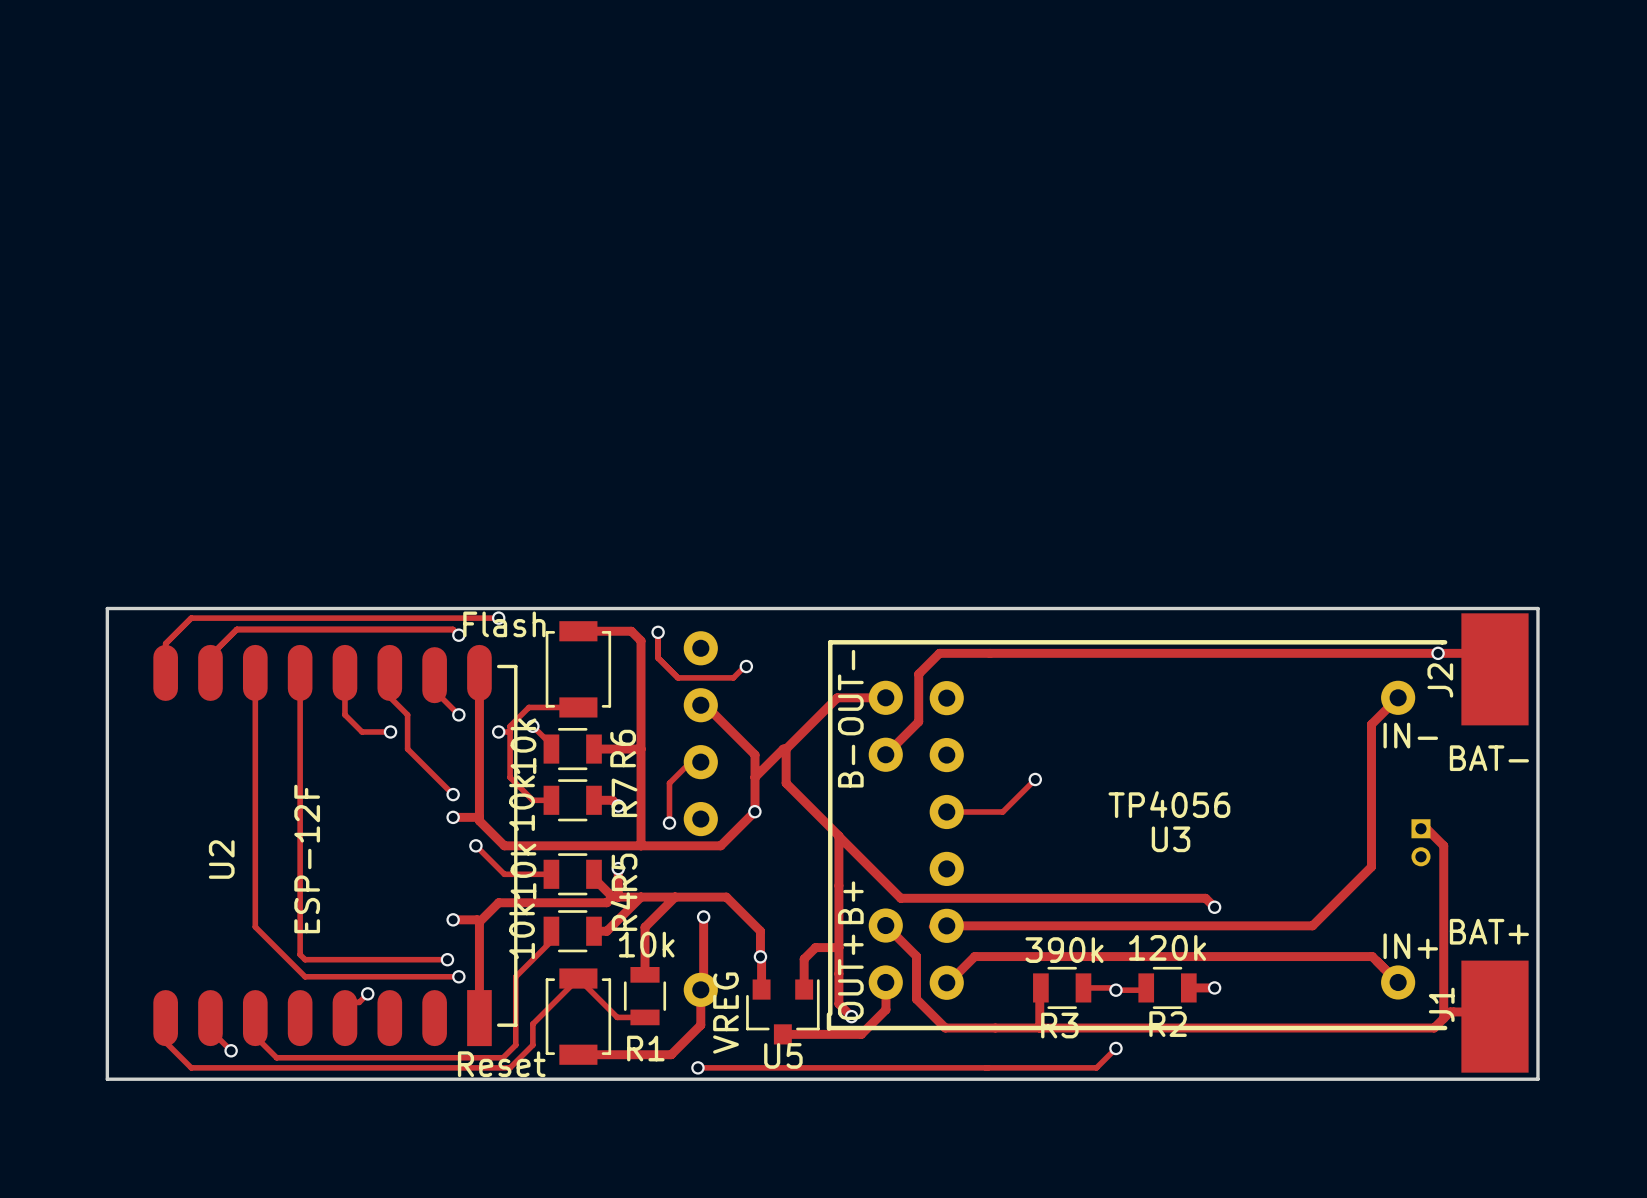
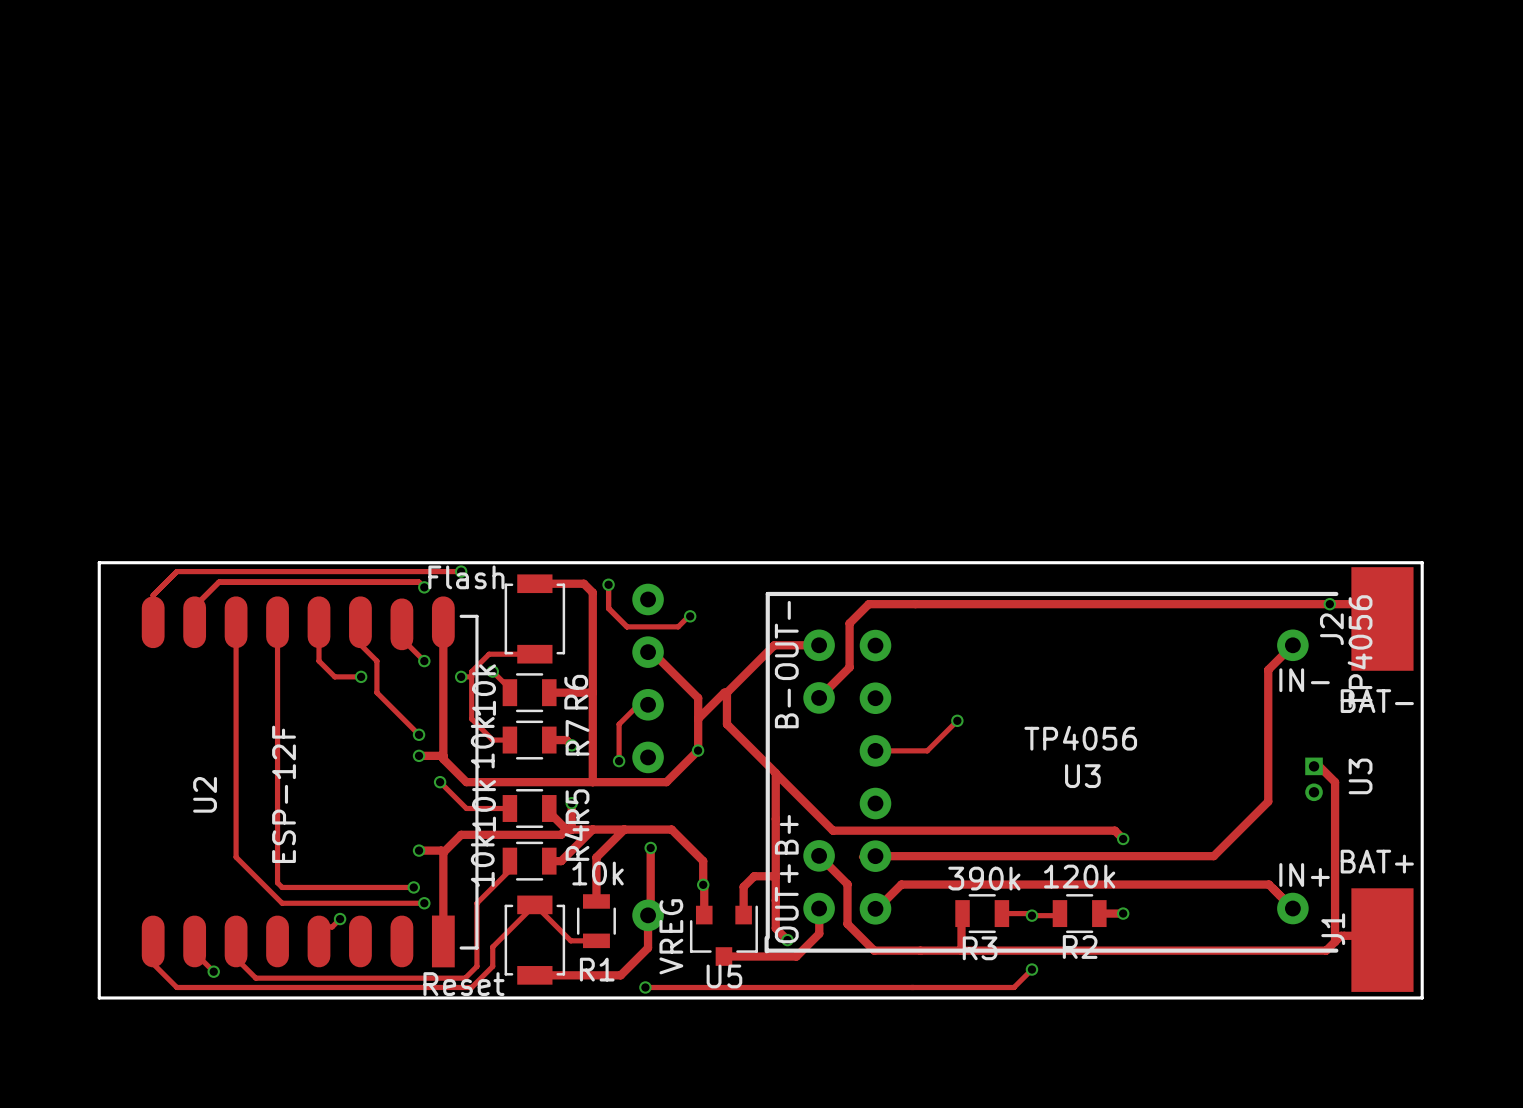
text: none -> TP4056 (1080, 738)
U3 value rotation: 0° (1169, 804) -> 90° counterclockwise (1360, 651)
U3 value position: TP4056 (1169, 804) -> TP4056 (1360, 651)
U3 name rotation: 0° (1171, 839) -> 90° counterclockwise (1360, 776)
U3 name position: U3 (1171, 839) -> U3 (1360, 776)

